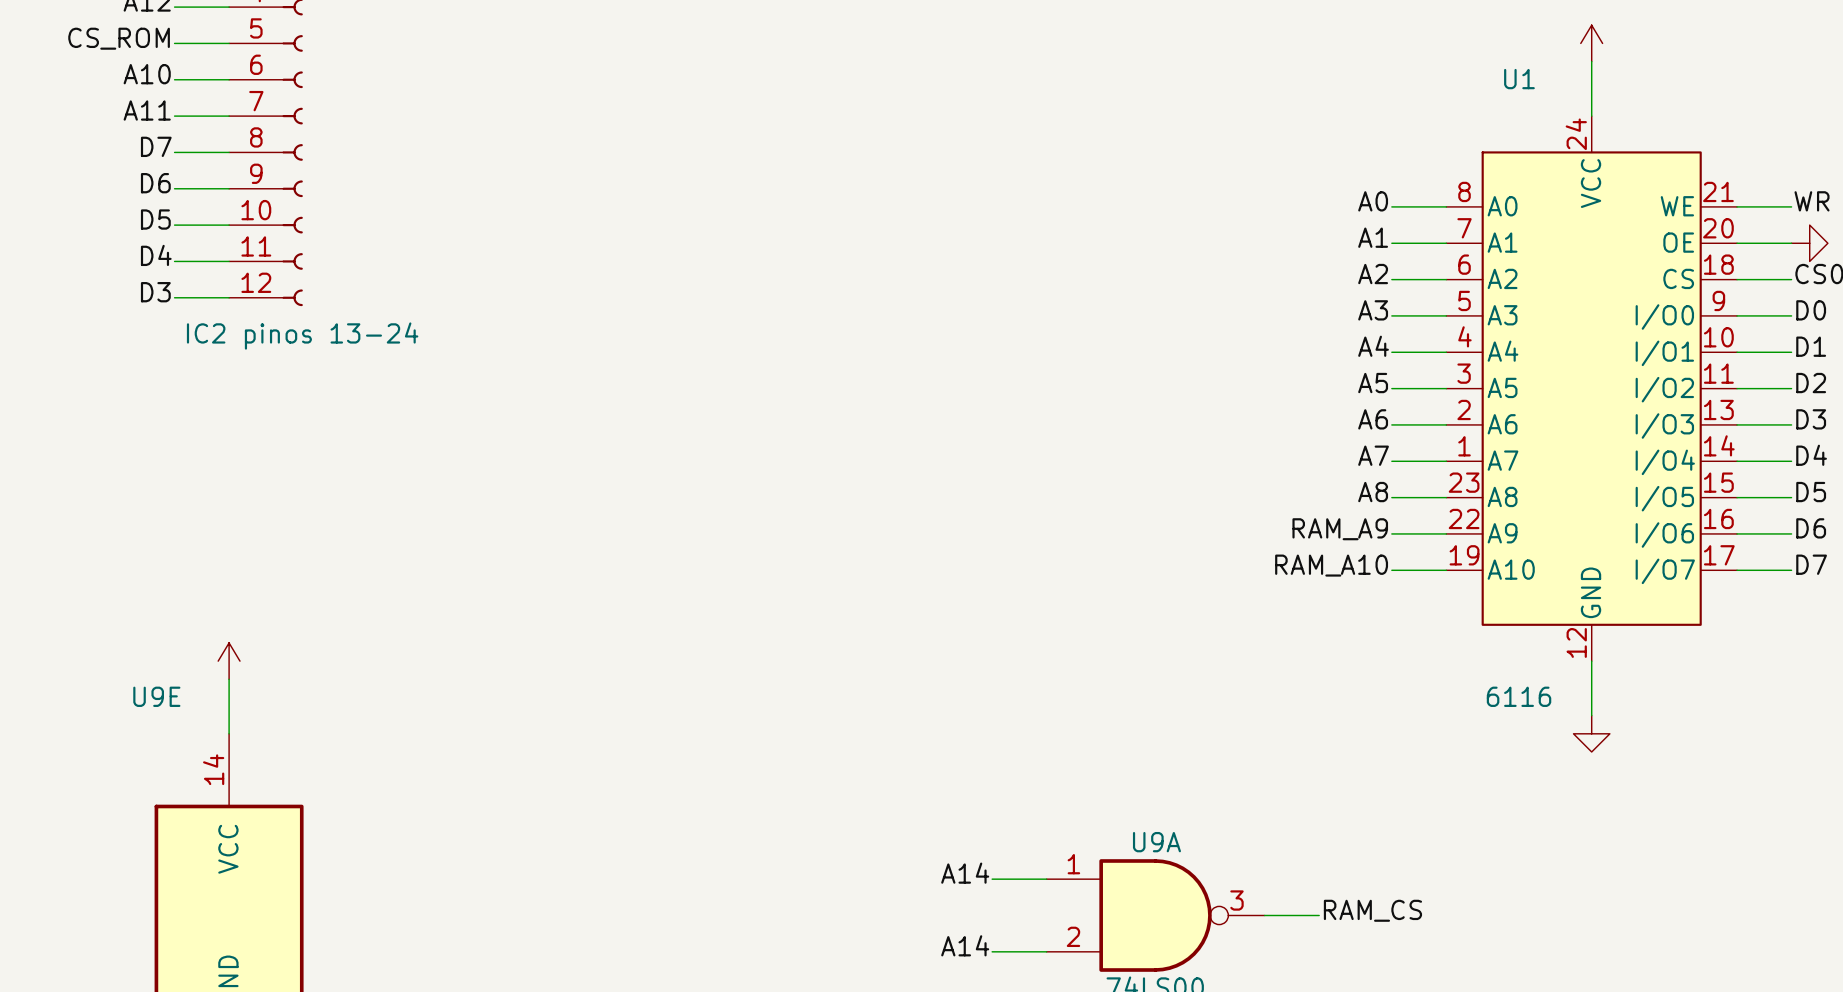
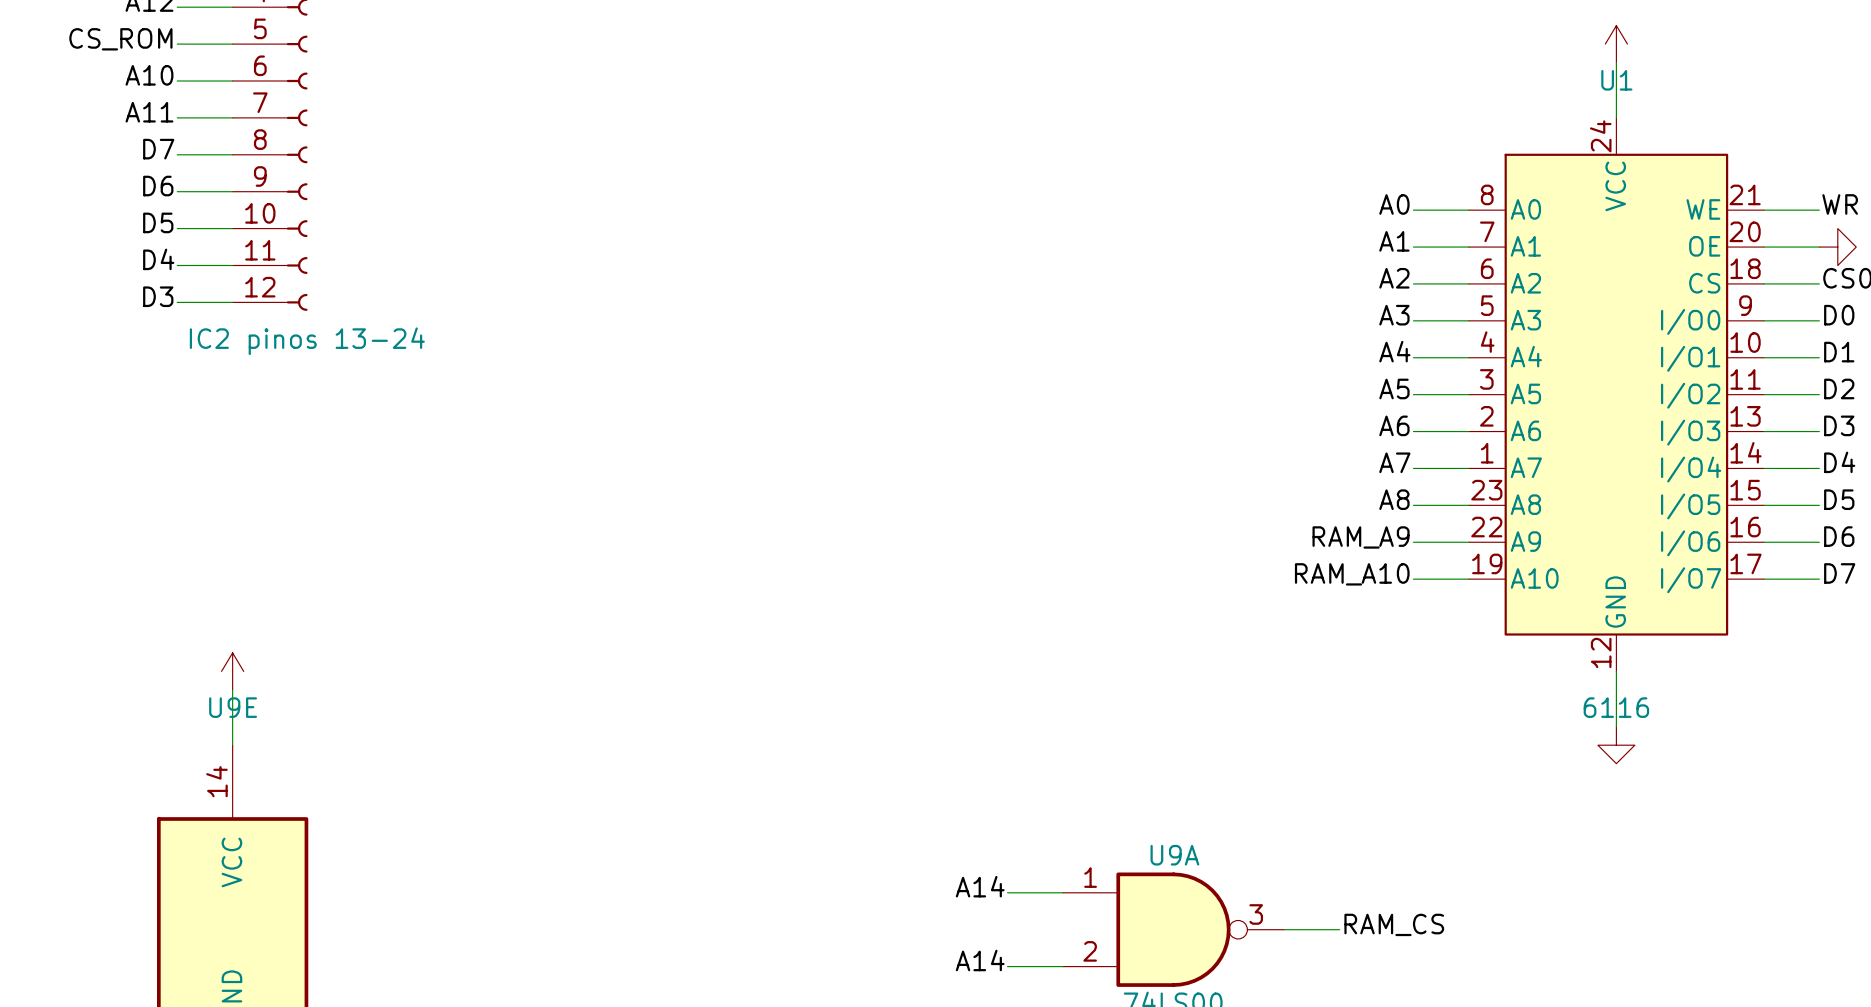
U1 name position: U1 (1519, 79) -> U1 (1616, 80)
U9E name position: U9E (156, 696) -> U9E (233, 707)
U1 value position: 6116 (1519, 696) -> 6116 (1616, 707)

